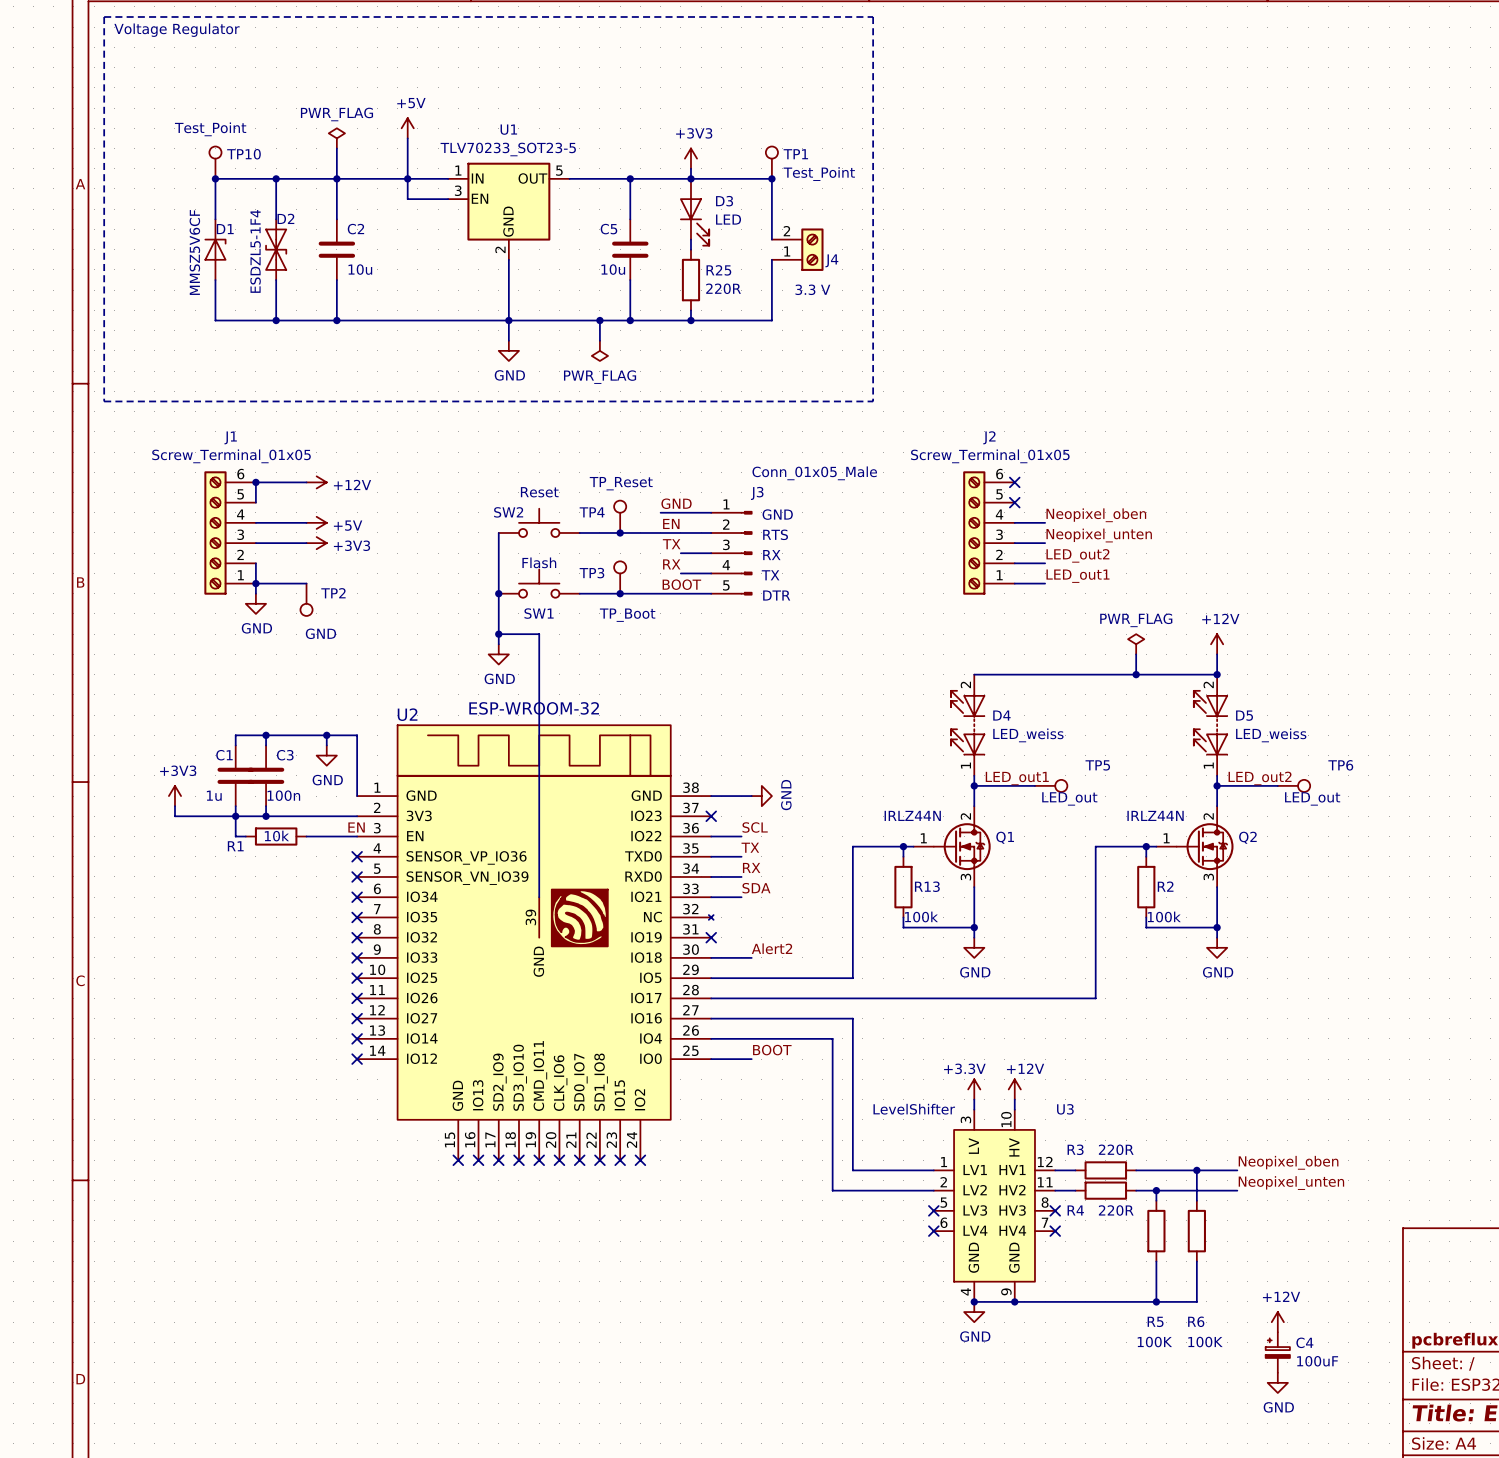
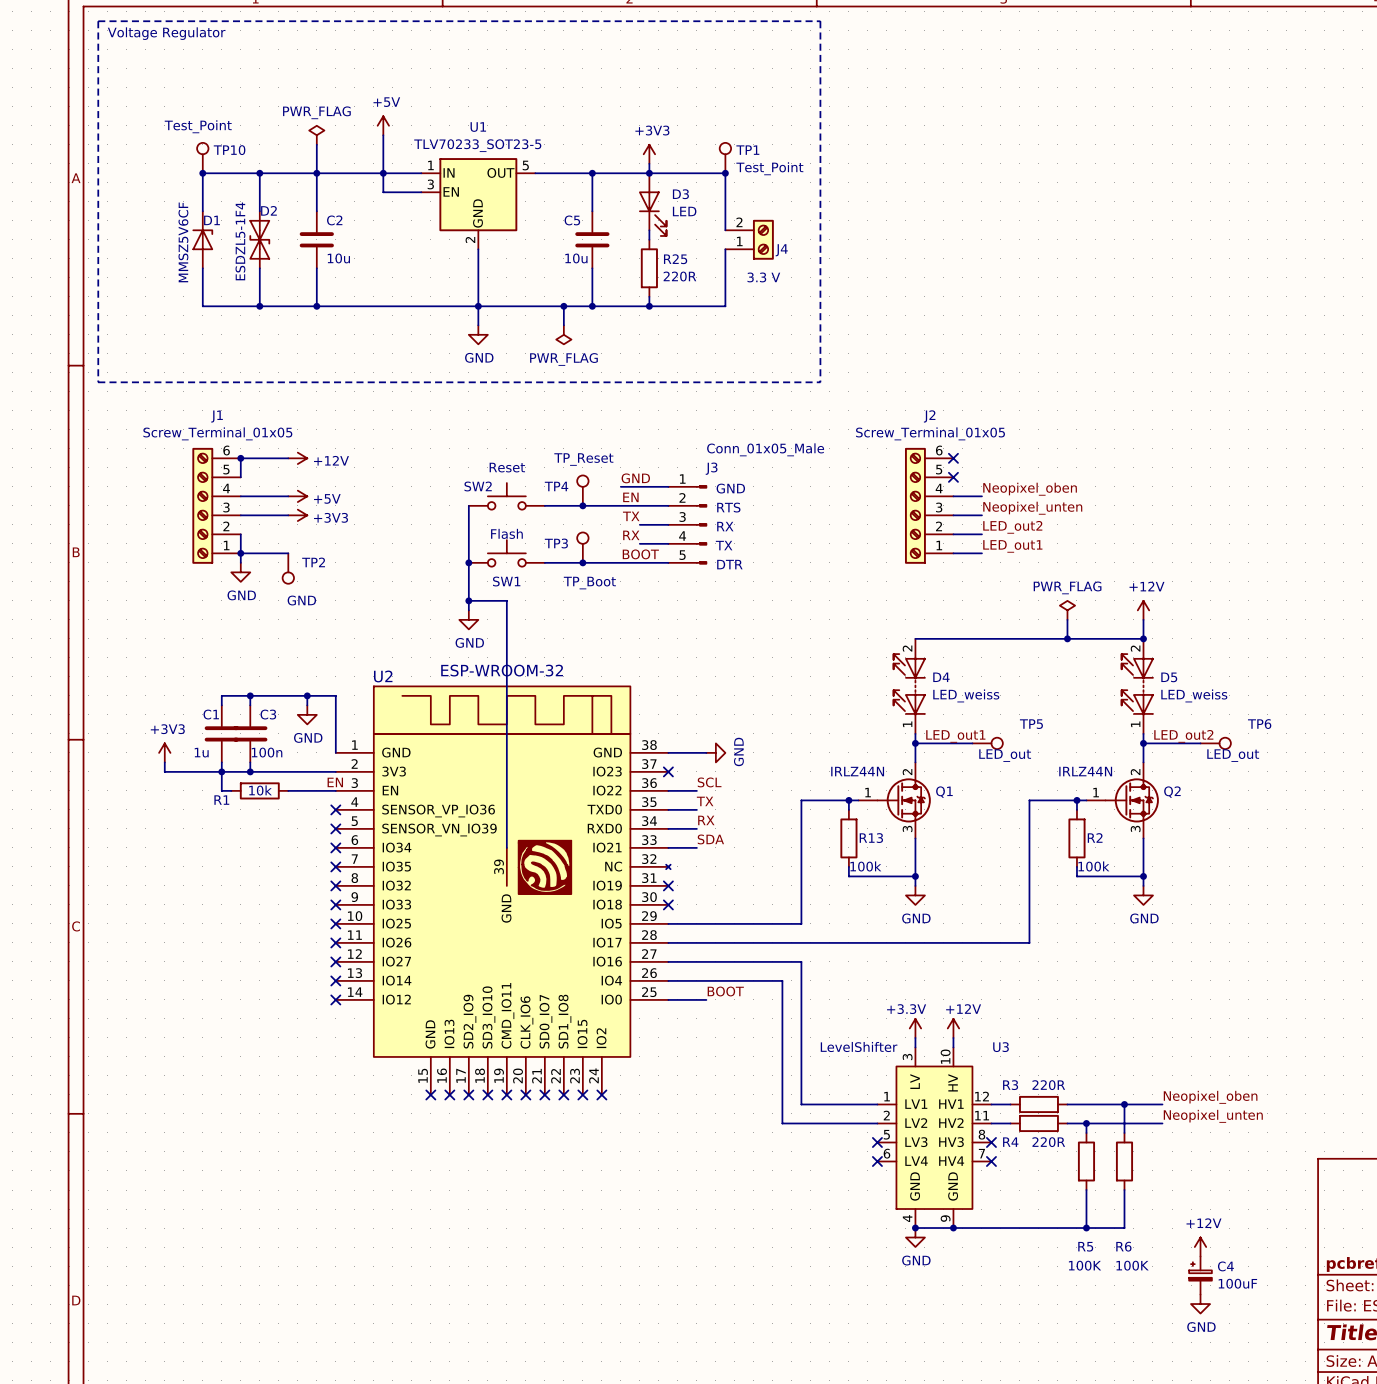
label: Alert2 (771, 948) -> none
wire: (711, 957) (751, 957) -> none
no-connect mark: none -> (668, 904)

